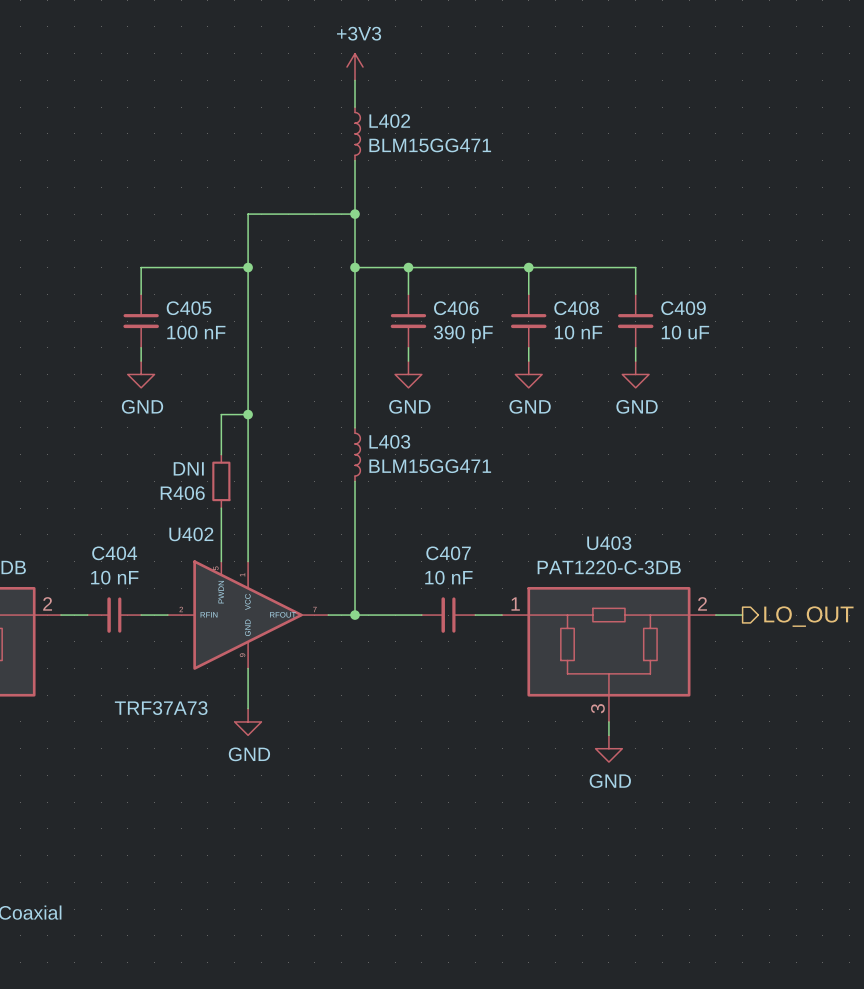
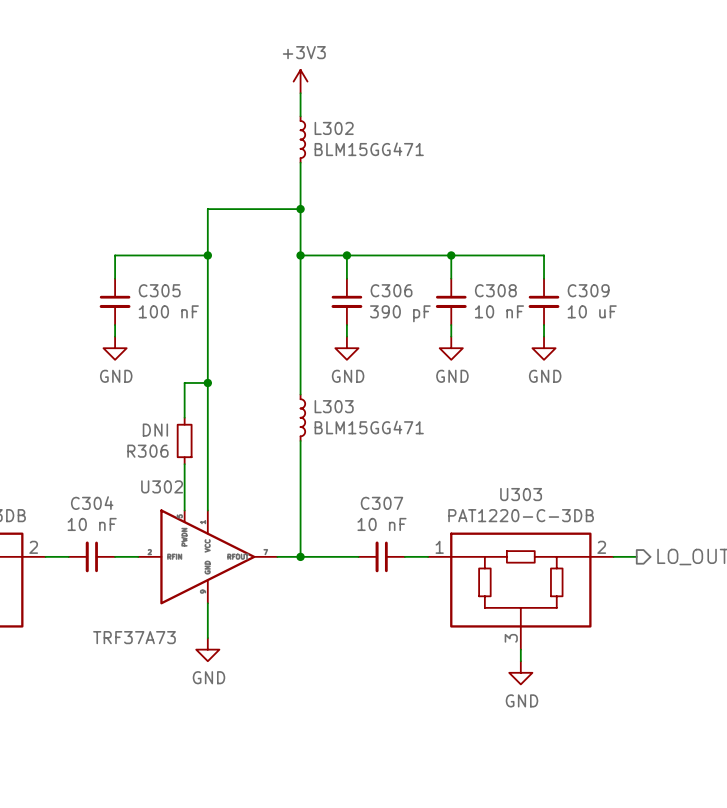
L402 name: L402 (389, 121) -> L302 (334, 128)
C405 name: C405 (189, 308) -> C305 (159, 290)
C406 name: C406 (456, 308) -> C306 (391, 290)
C408 name: C408 (576, 308) -> C308 (495, 290)
C409 name: C409 (683, 308) -> C309 (588, 290)
L403 name: L403 (389, 441) -> L303 (334, 406)
R406 name: R406 (182, 493) -> R306 (147, 451)
U402 name: U402 (191, 534) -> U302 (162, 486)
U403 name: U403 (609, 543) -> U303 (521, 494)
C404 name: C404 (114, 553) -> C304 (92, 503)
C407 name: C407 (448, 553) -> C307 (381, 503)

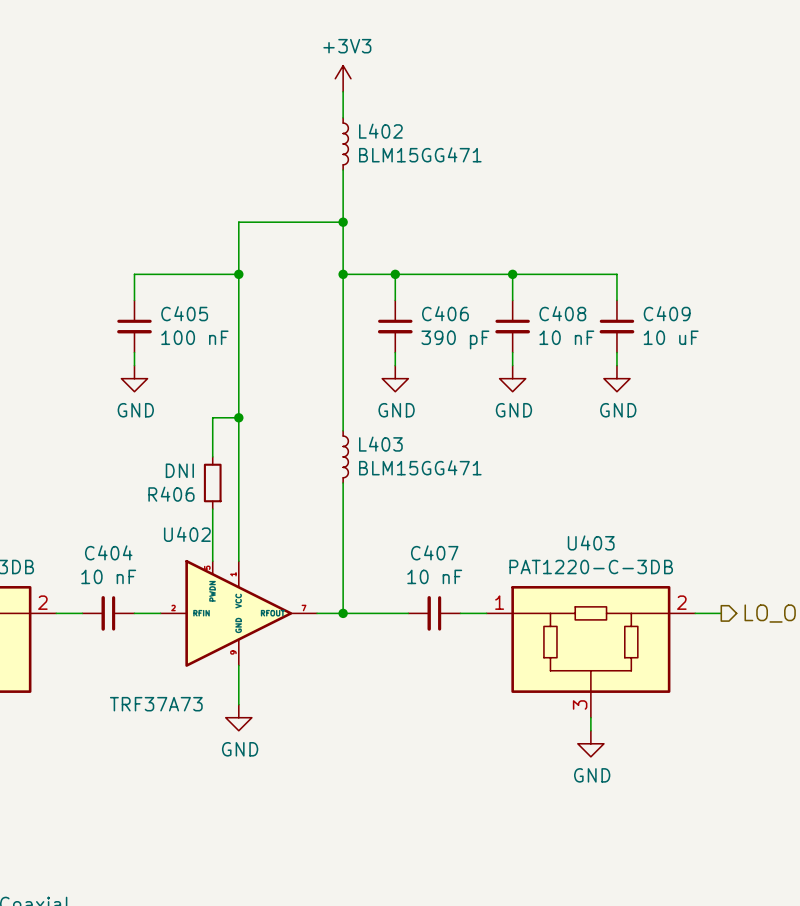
L302 name: L302 (334, 128) -> L402 (380, 131)
C305 name: C305 (159, 290) -> C405 (184, 313)
C306 name: C306 (391, 290) -> C406 (445, 313)
C308 name: C308 (495, 290) -> C408 (562, 313)
C309 name: C309 (588, 290) -> C409 (667, 313)
L303 name: L303 (334, 406) -> L403 (380, 444)
R306 name: R306 (147, 451) -> R406 (171, 494)
U302 name: U302 (162, 486) -> U402 (187, 534)
U303 name: U303 (521, 494) -> U403 (591, 542)
C304 name: C304 (92, 503) -> C404 (108, 552)
C307 name: C307 (381, 503) -> C407 (434, 552)

